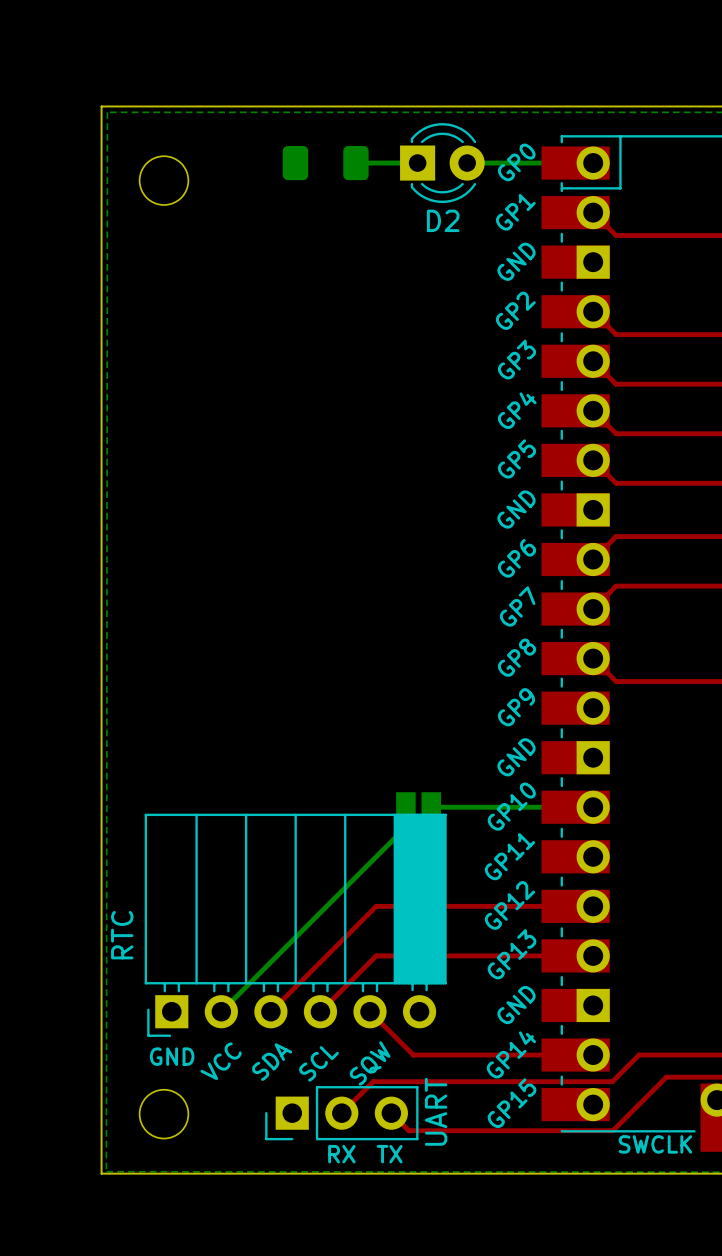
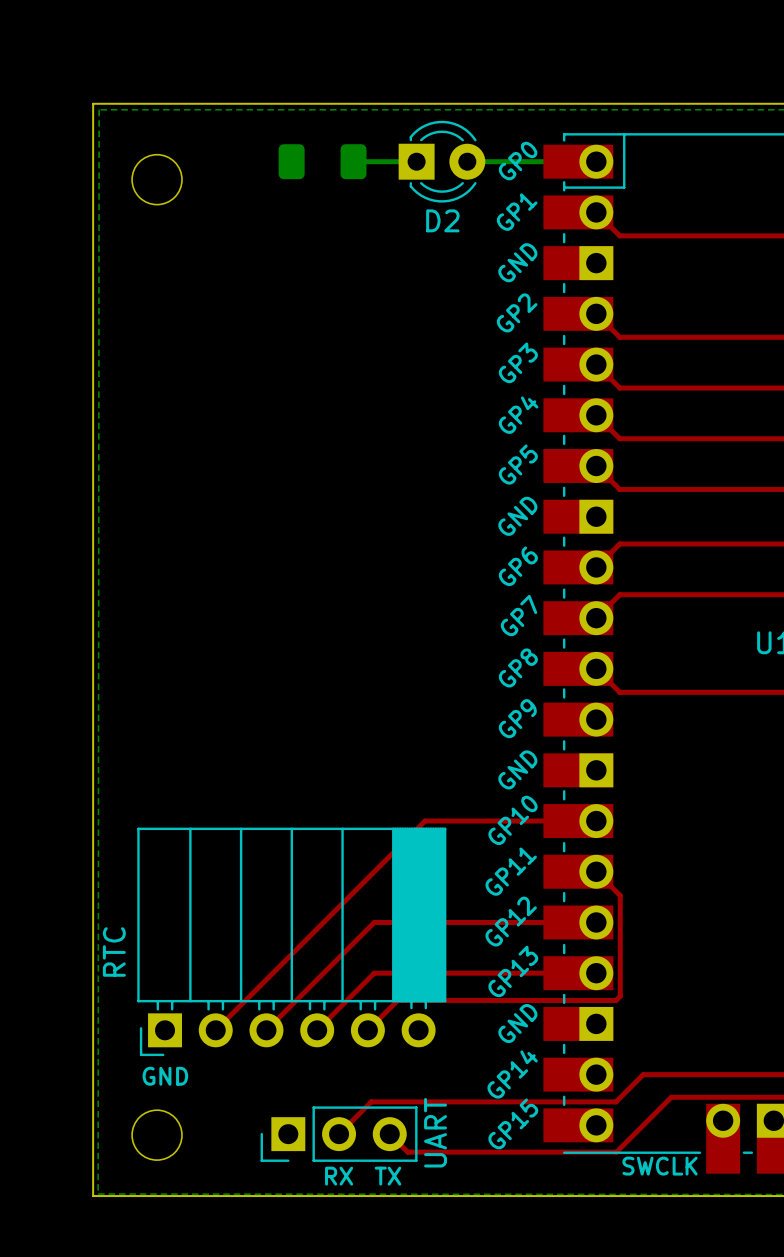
bottom track: (405, 806) (405, 827) (221, 1011) -> none
part: (418, 806) -> none
bottom track: (431, 806) (593, 807) -> none
top track: none -> (596, 821) (425, 821) (215, 1030)
top track: (370, 1011) (413, 1055) (593, 1055) -> (367, 1030) (397, 1000) (616, 1000) (620, 996) (620, 895) (596, 871)
text: VCC (221, 1061) -> none
text: SDA (272, 1062) -> none
text: SCL (319, 1063) -> none
text: SQW (370, 1063) -> none

